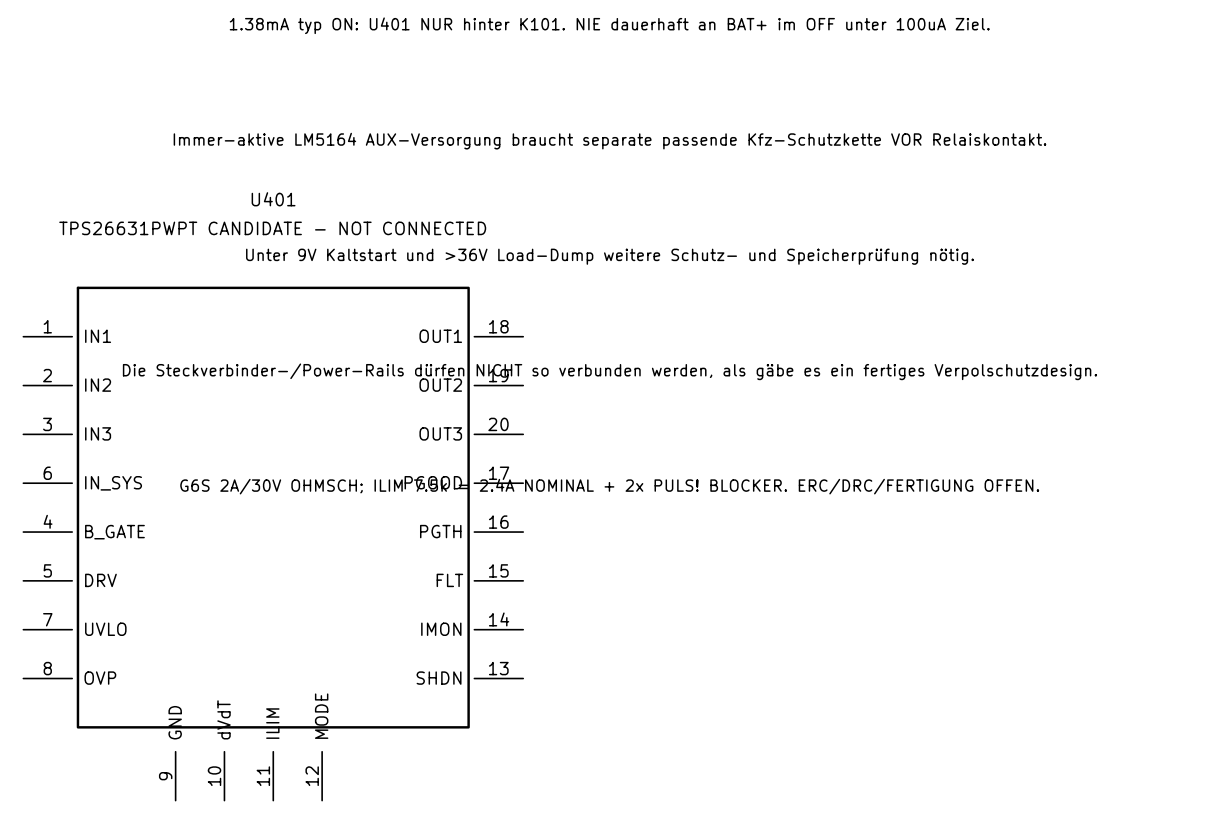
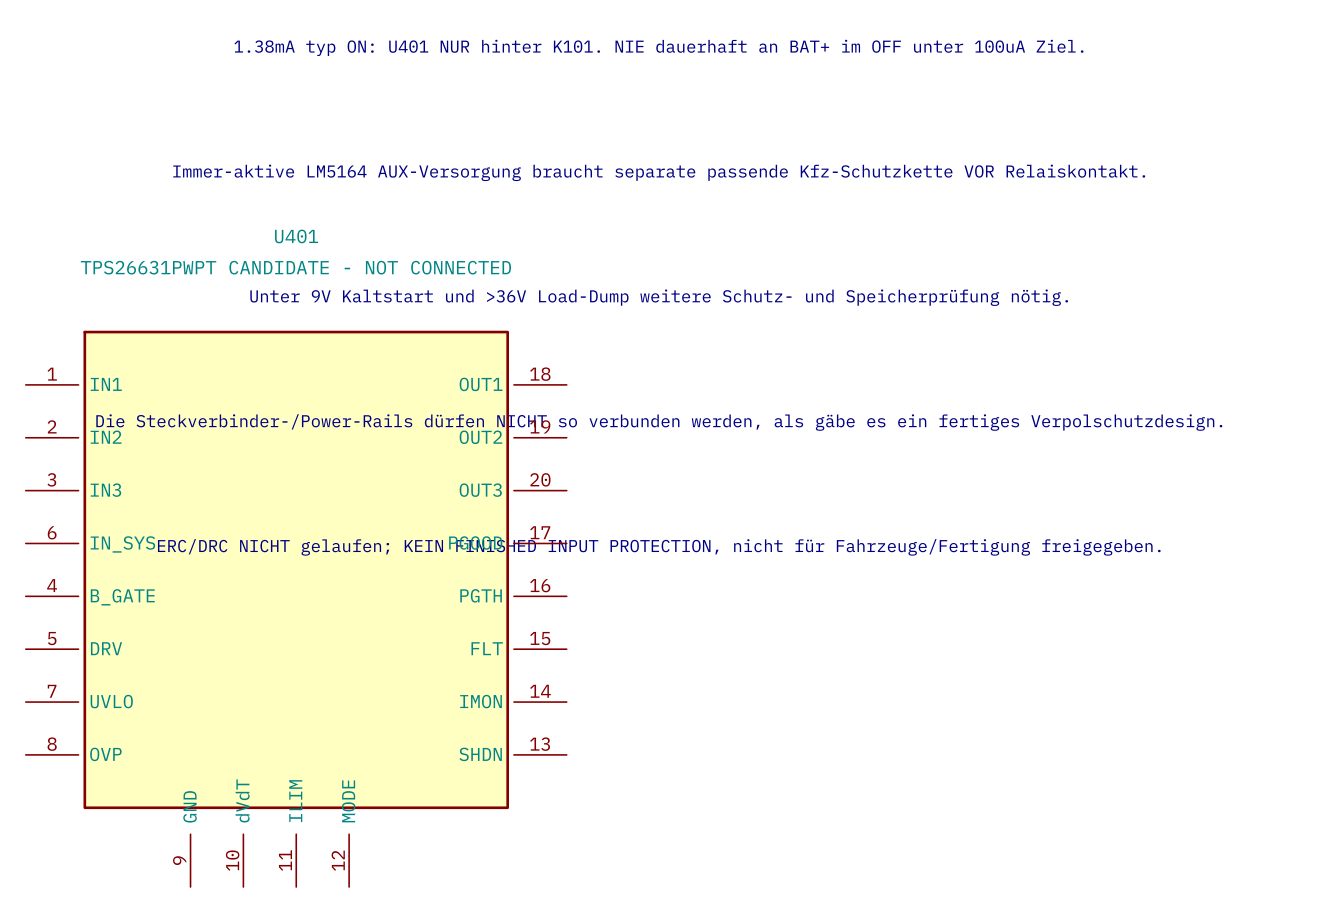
text: G6S 2A/30V OHMSCH; ILIM 7.5k = 2.4A NOMINAL + 2x PULS! BLOCKER. ERC/DRC/FERTIGUNG OFFEN. (609, 486) -> ERC/DRC NICHT gelaufen; KEIN FINISHED INPUT PROTECTION, nicht für Fahrzeuge/Fertigung freigegeben. (659, 547)

